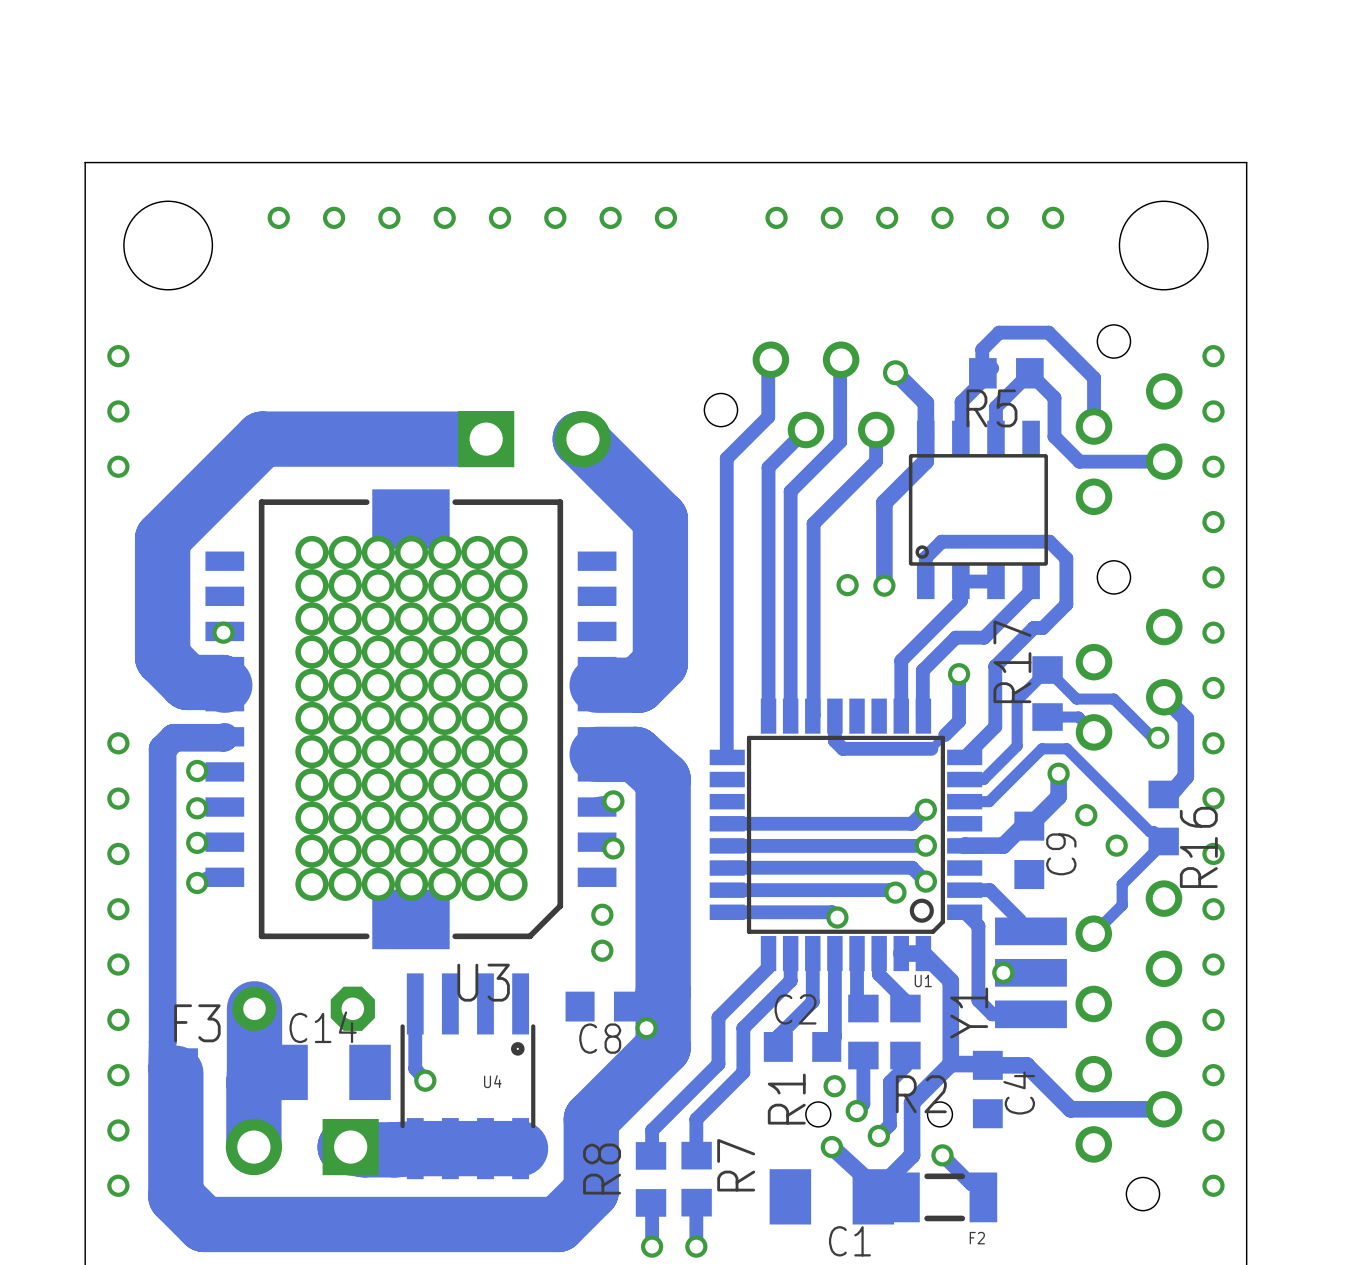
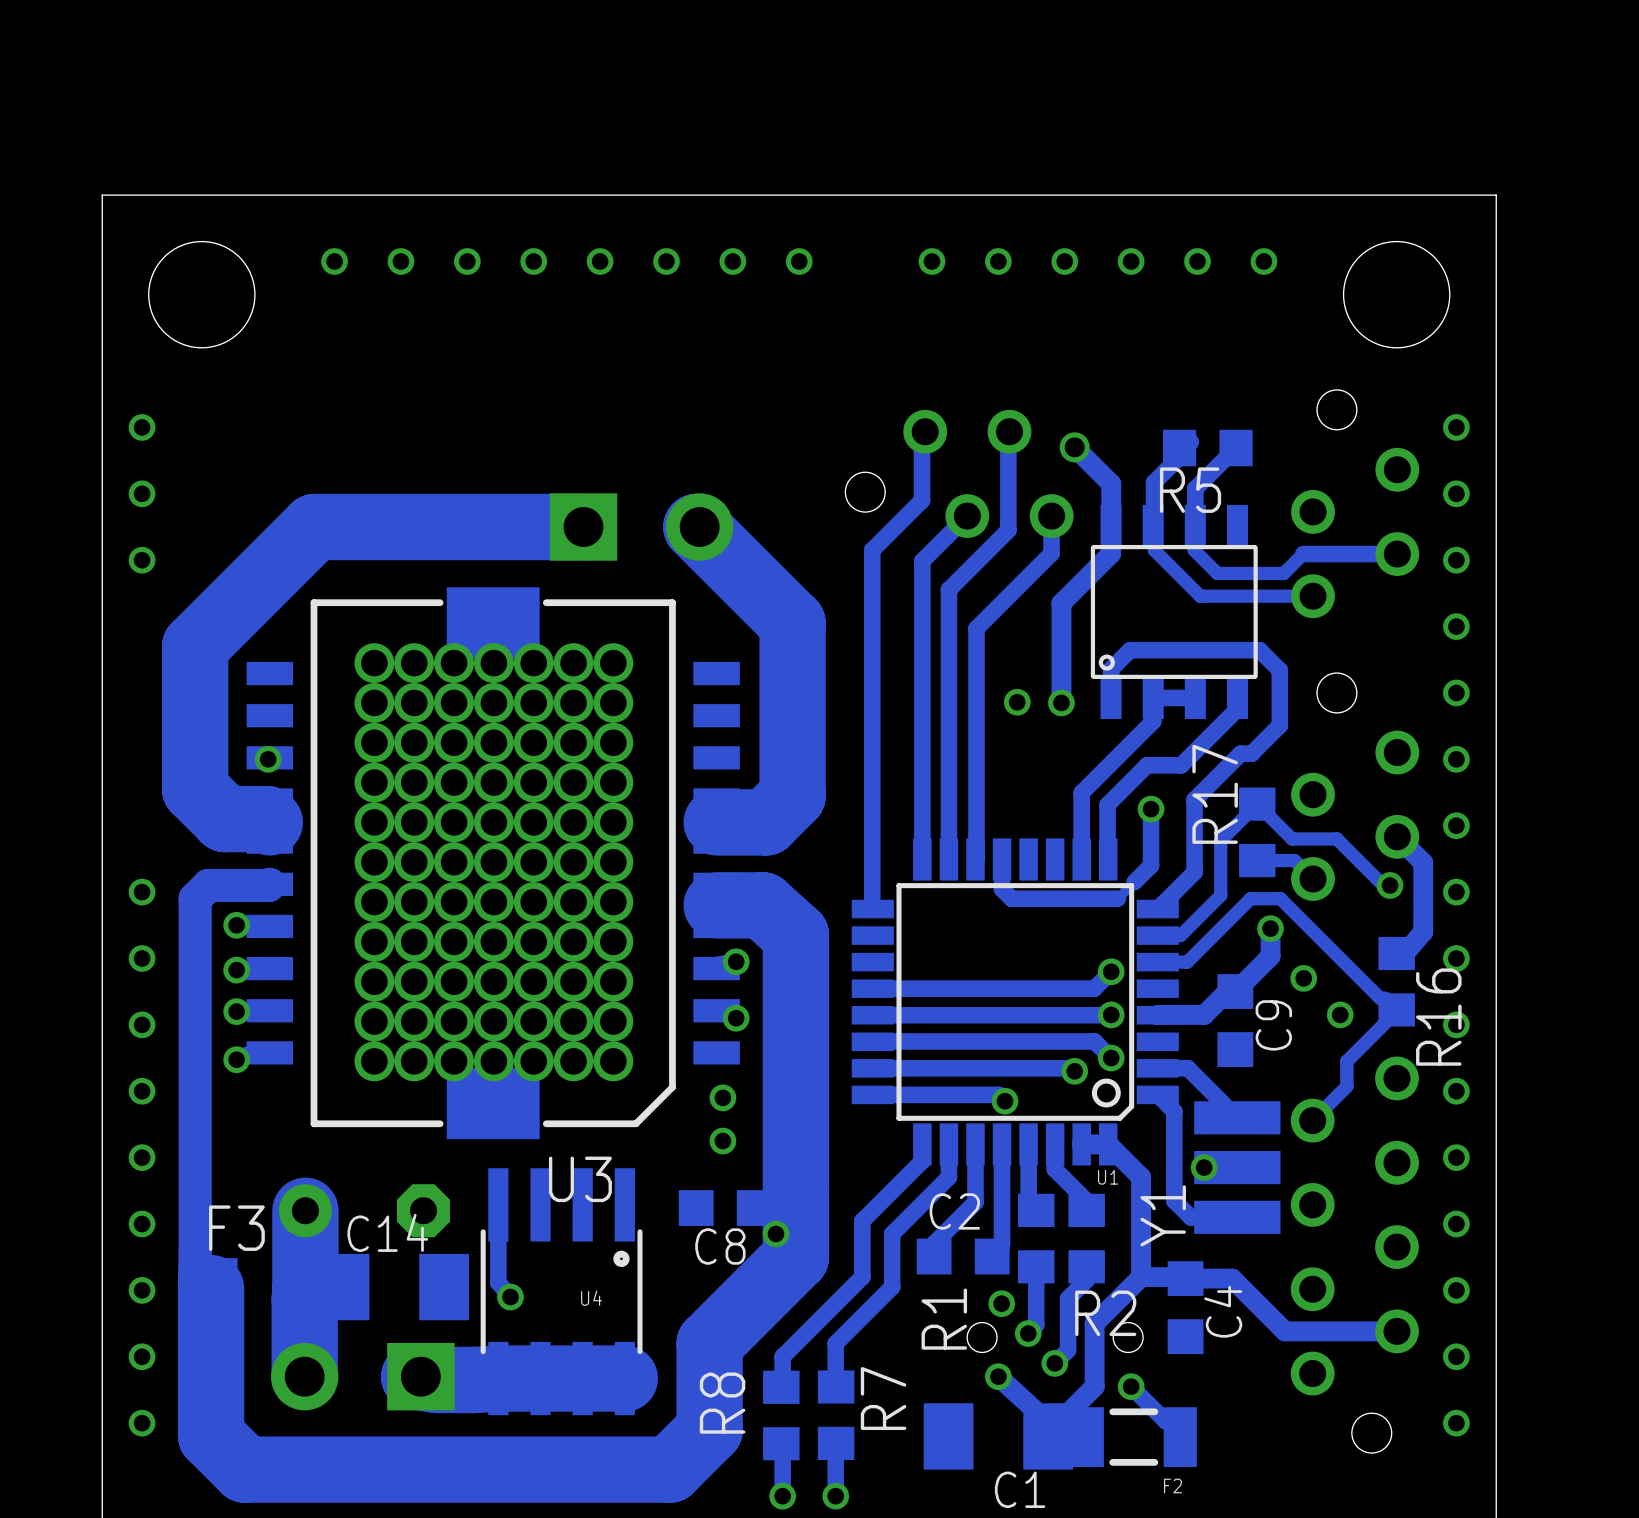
track: (982, 372) (982, 349) (999, 332) (1048, 332) (1094, 377) (1094, 426) -> none
track: (1029, 373) (1054, 397) (1054, 436) (1079, 461) (1085, 461) -> (1195, 525) (1194, 550) (1217, 573) (1283, 573) (1303, 554)
track: none -> (1153, 525) (1154, 550) (1200, 596) (1313, 596)

